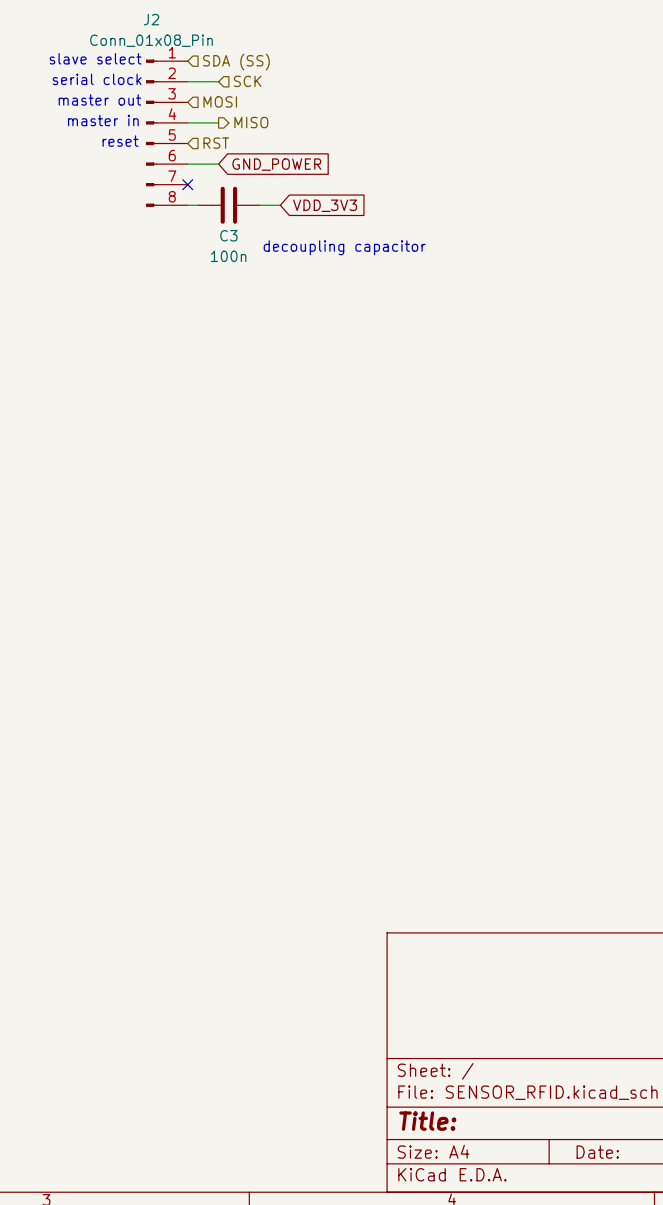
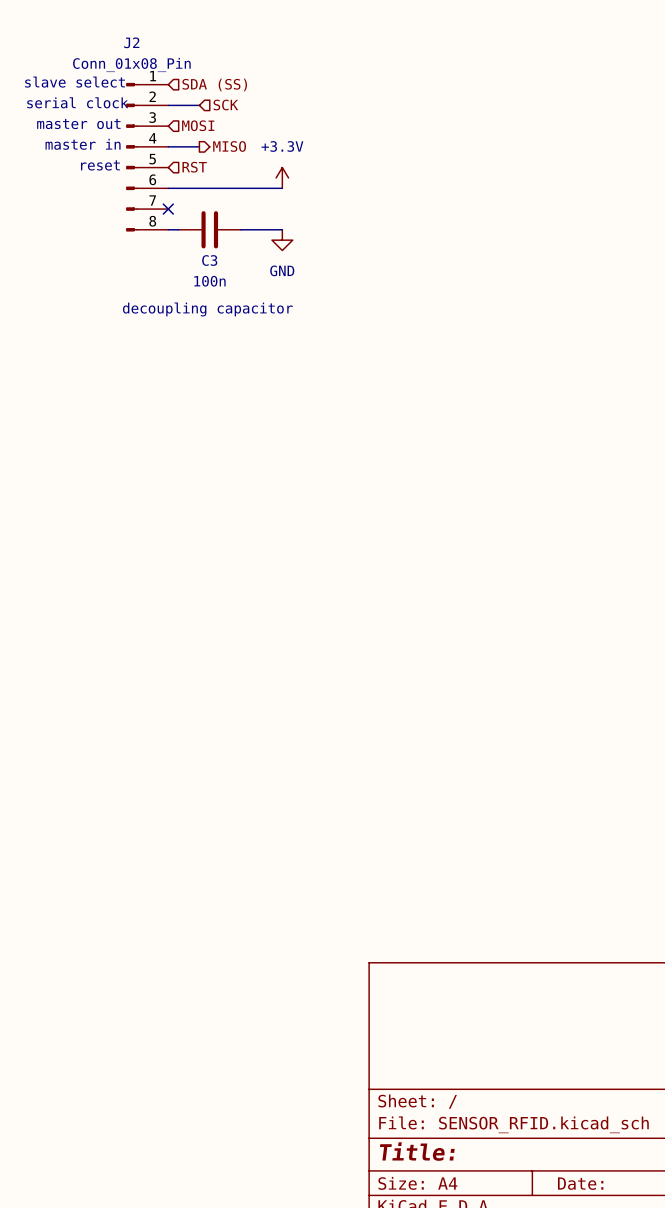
power symbol: none -> +3.3V (282, 177)
wire: none -> (199, 188) (282, 188)
global label: GND_POWER (276, 164) -> none
wire: none -> (261, 229) (282, 229)
global label: VDD_3V3 (325, 205) -> none
power symbol: none -> GND (282, 240)
text position: decoupling capacitor (344, 247) -> decoupling capacitor (207, 309)

